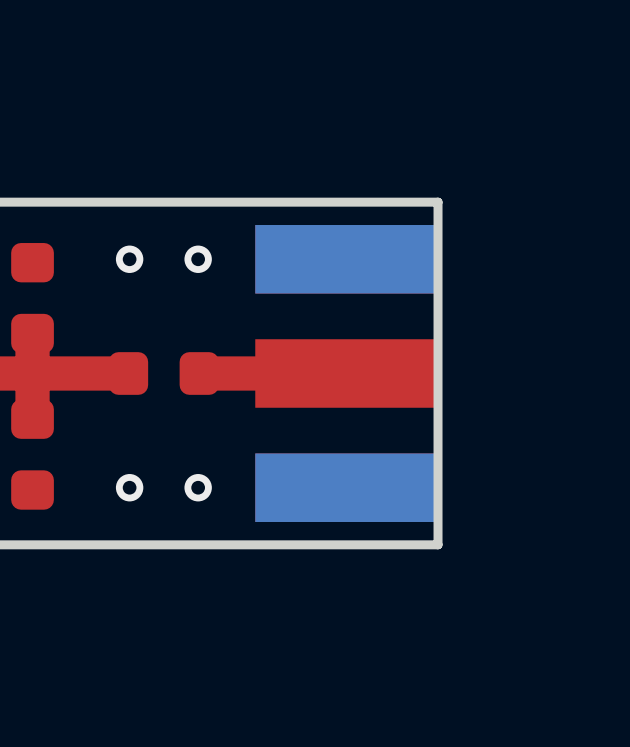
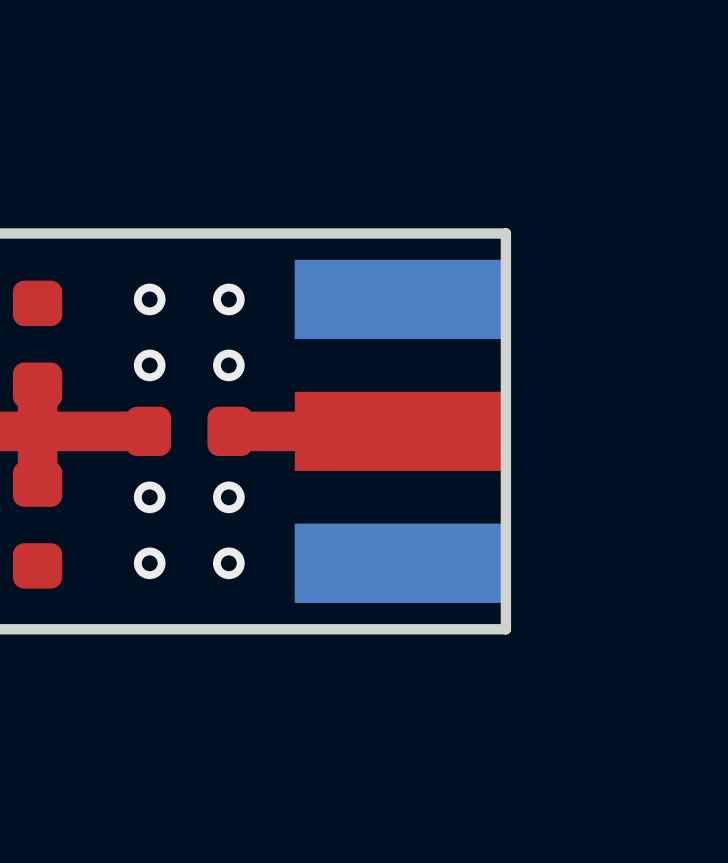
via: none -> (149, 365)
via: none -> (228, 365)
via: none -> (149, 497)
via: none -> (228, 497)

